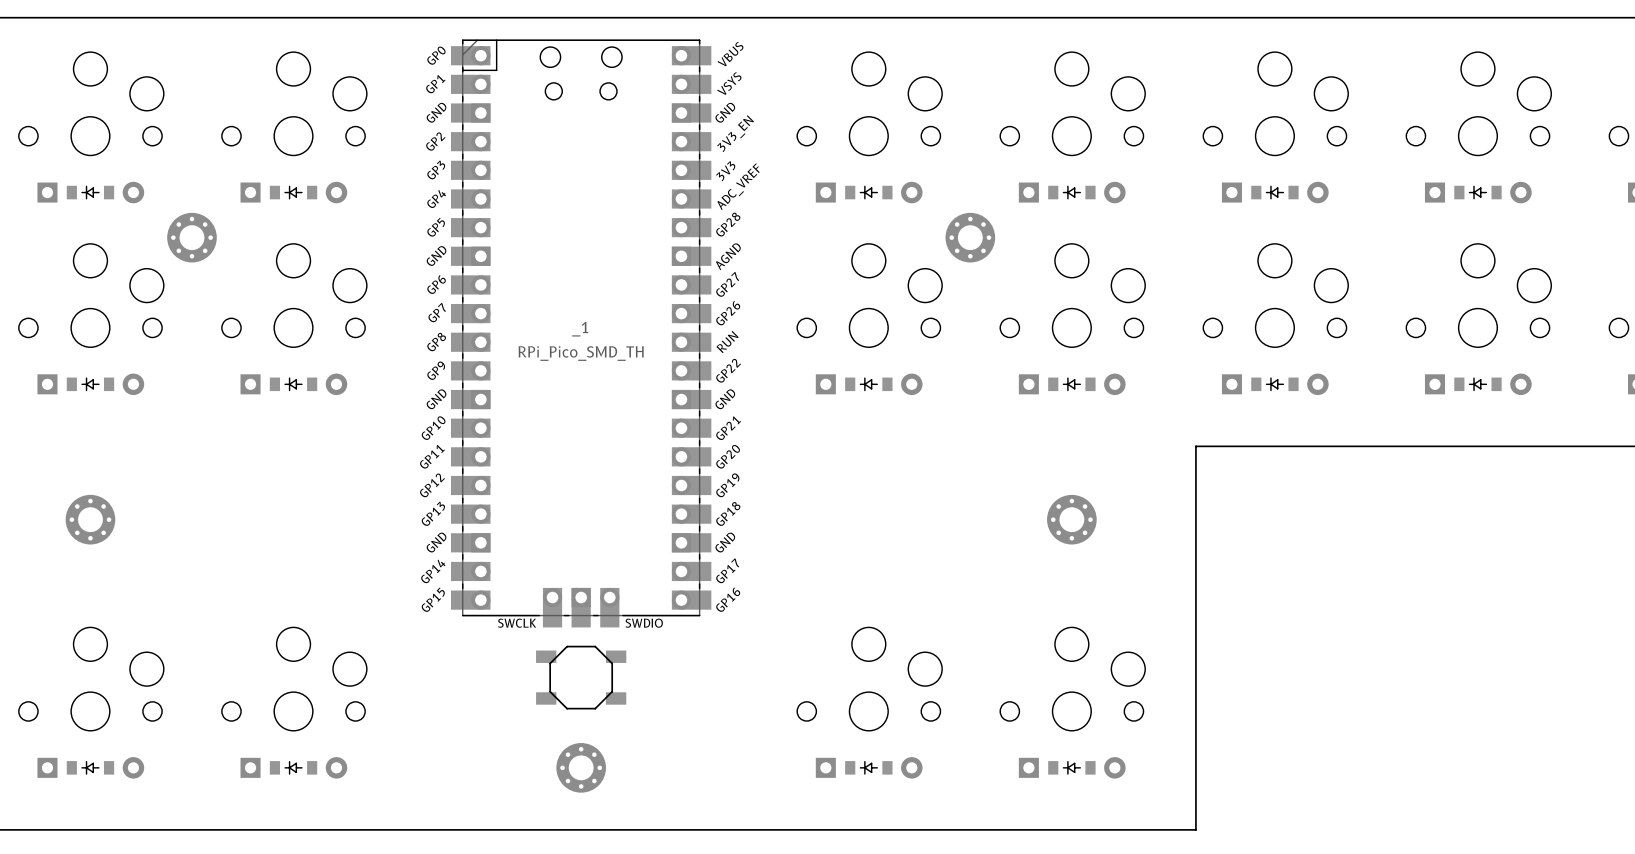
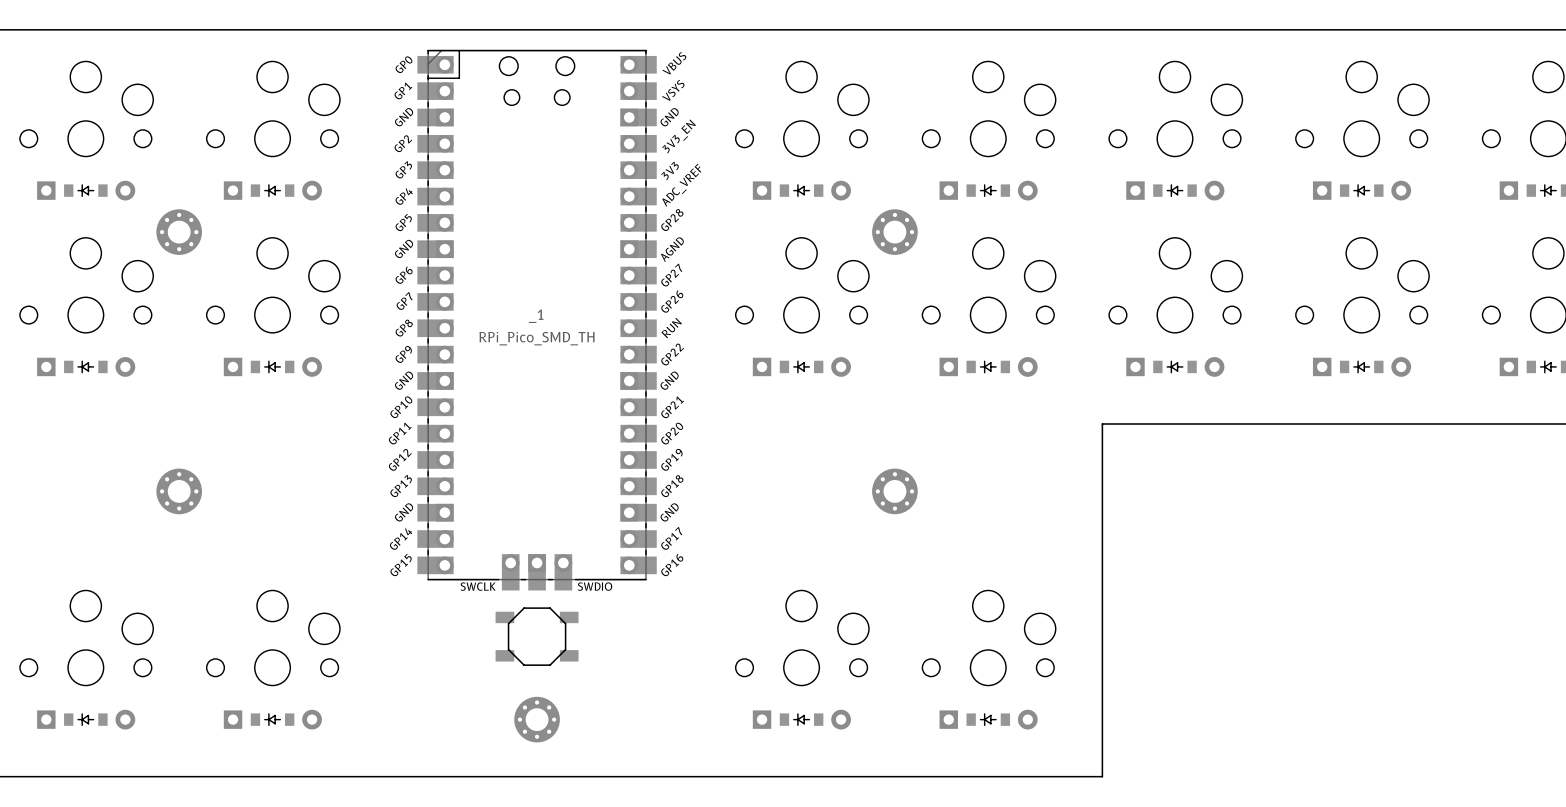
part position: (90, 519) -> (179, 491)
part position: (1071, 519) -> (894, 491)

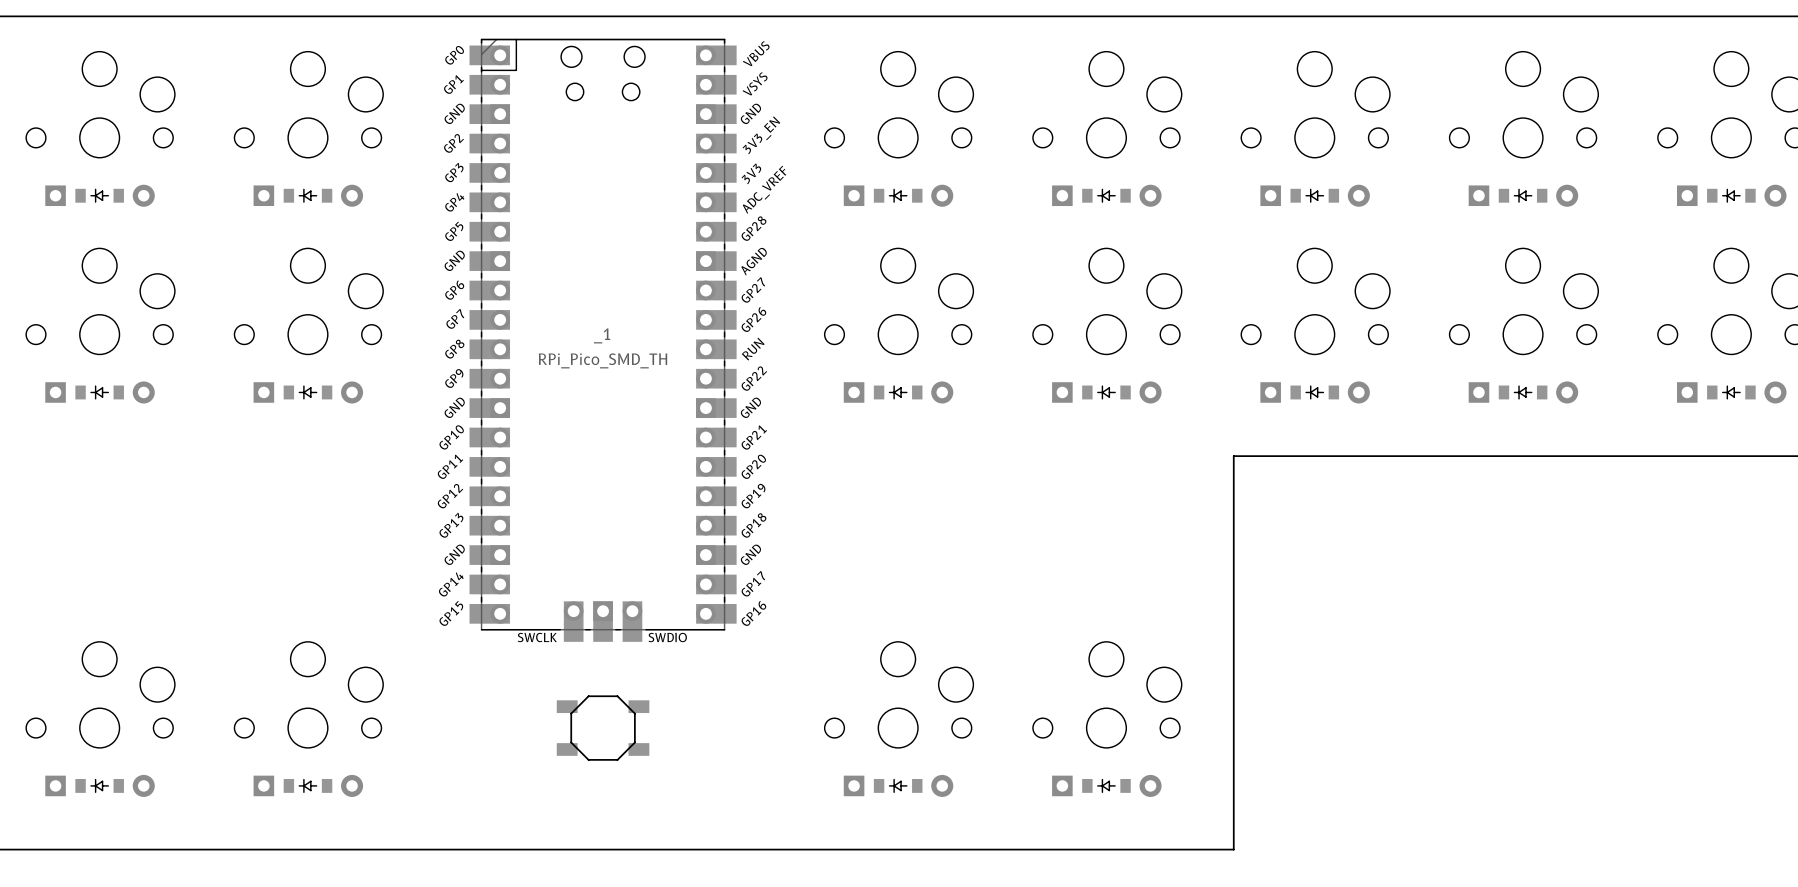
part: (179, 232) -> none
part: (894, 232) -> none
part: (179, 491) -> none
part: (894, 491) -> none
part position: (537, 636) -> (603, 728)
part: (537, 719) -> none

